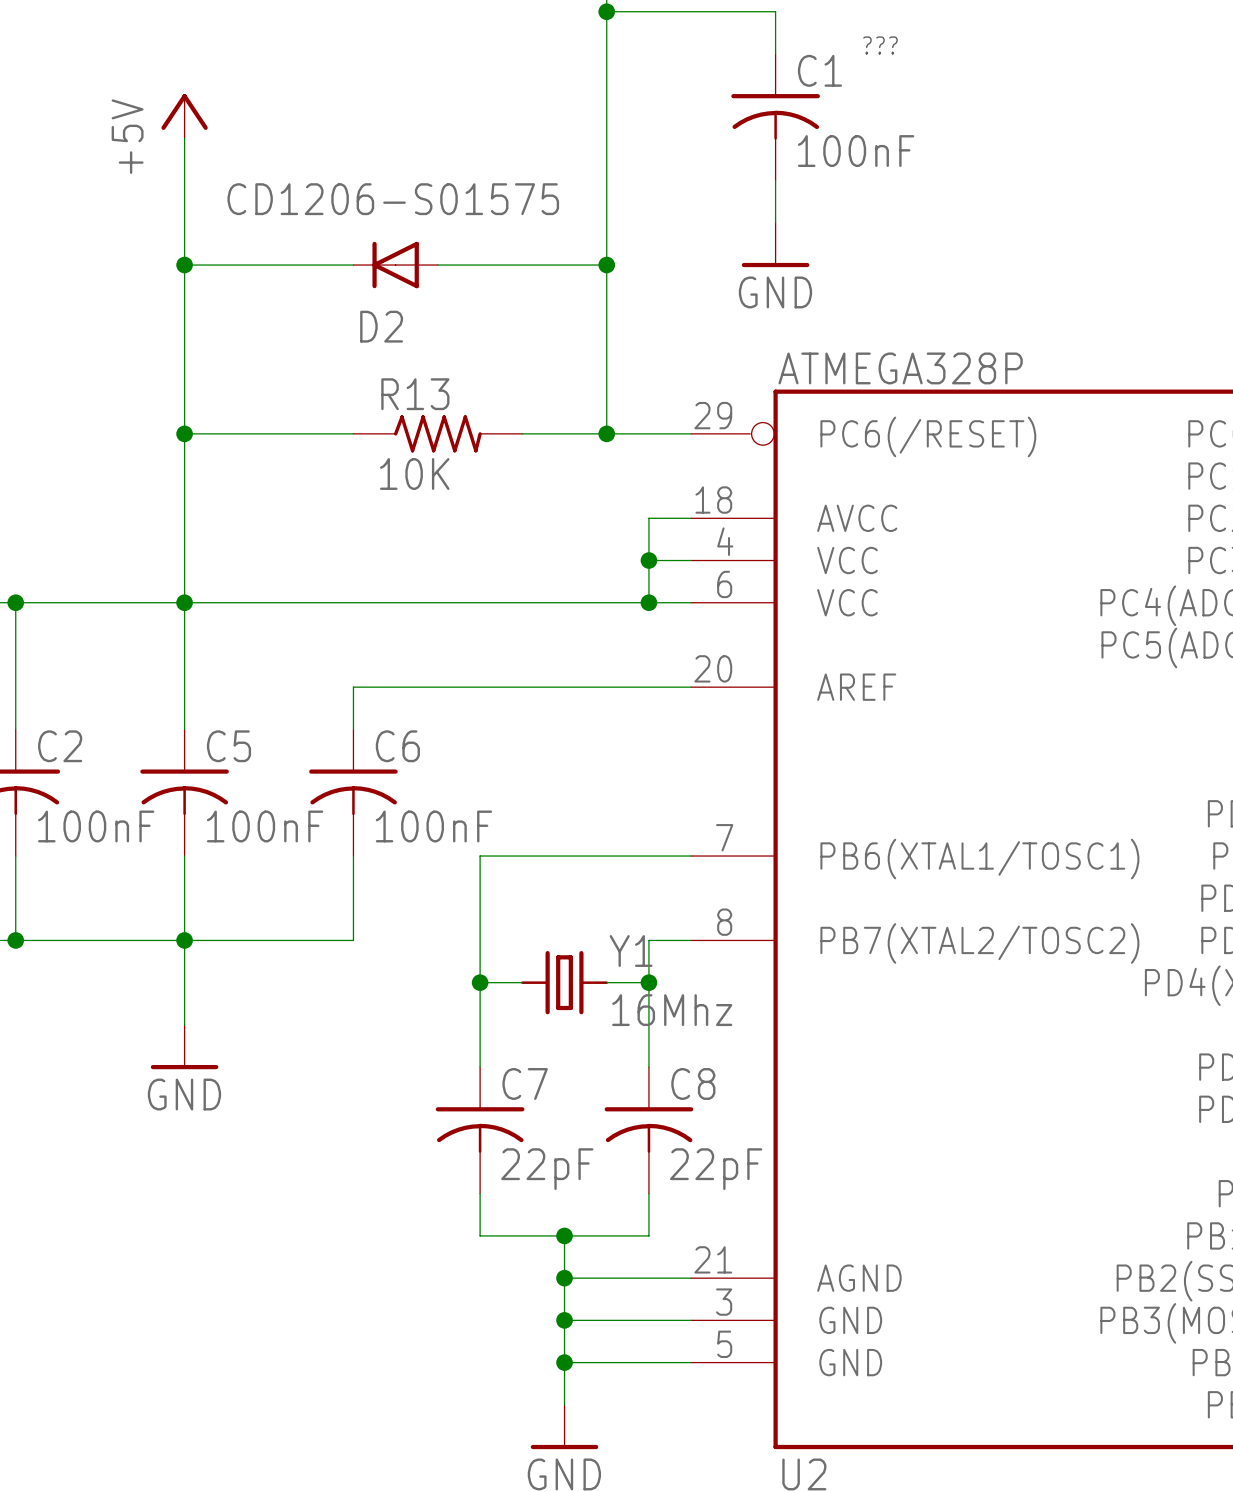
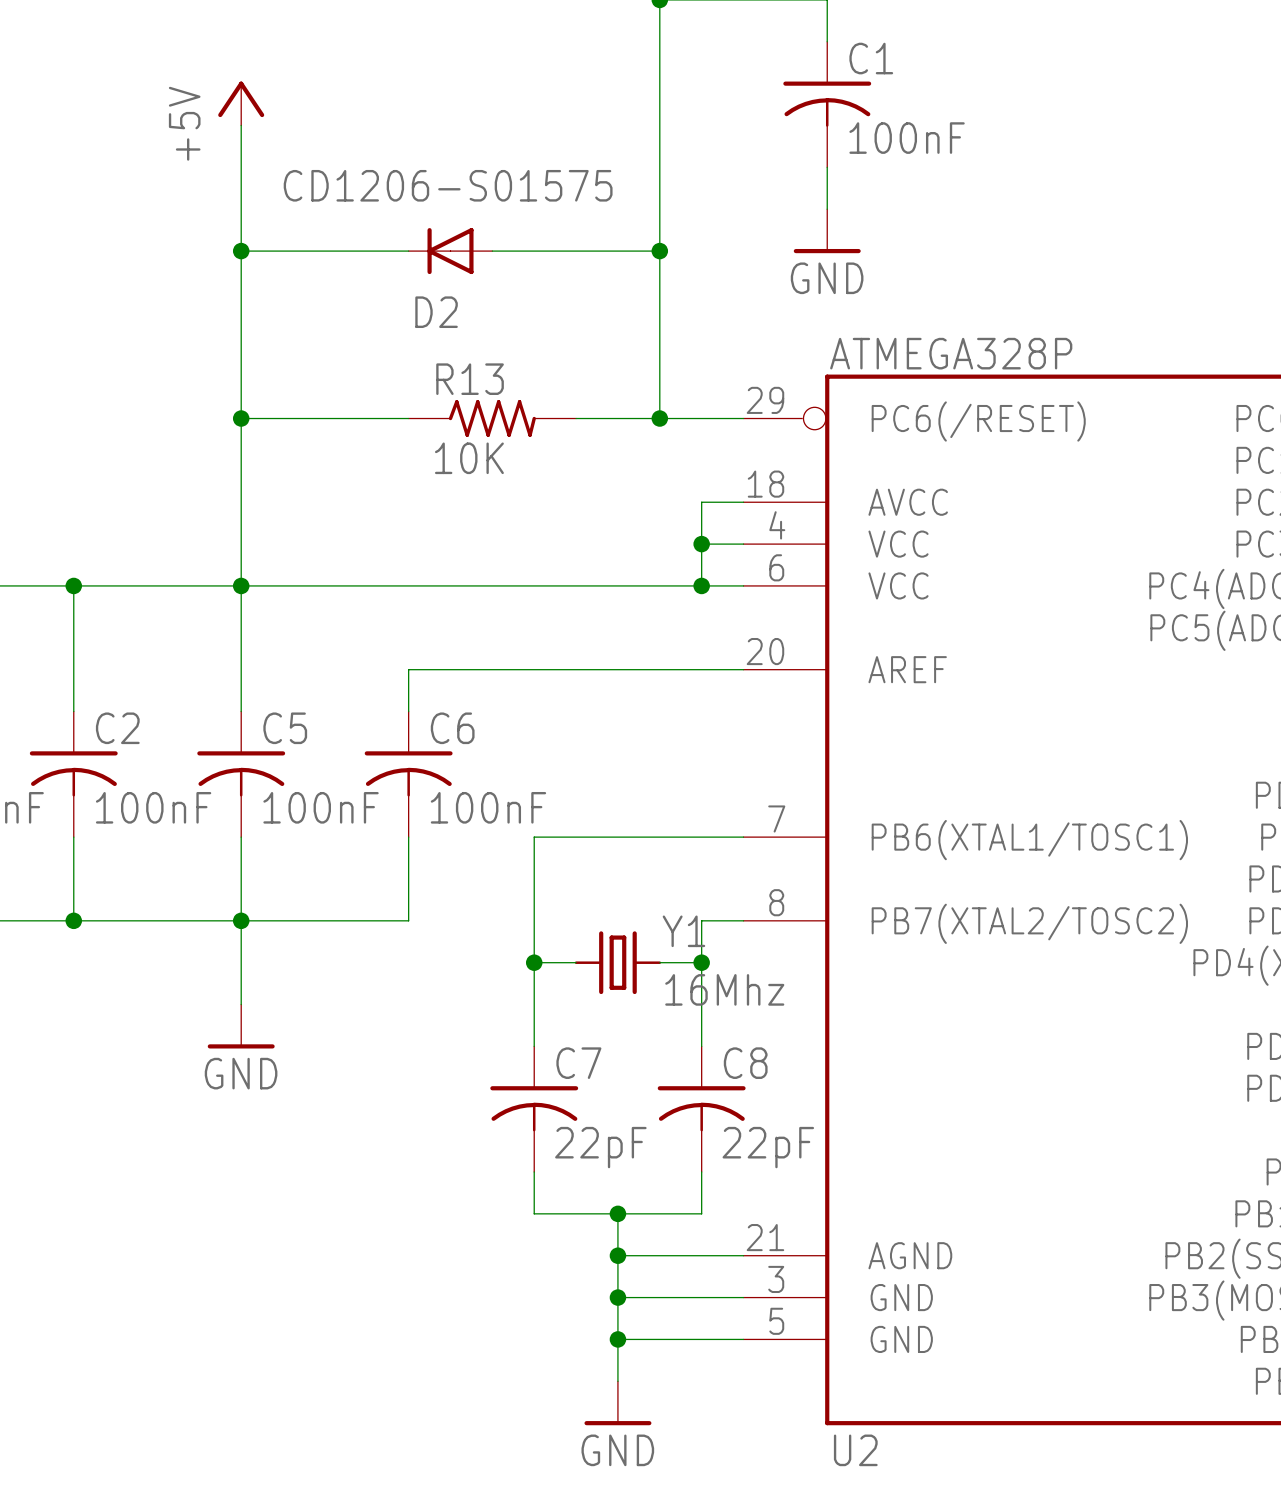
text: ??? (880, 45) -> none

